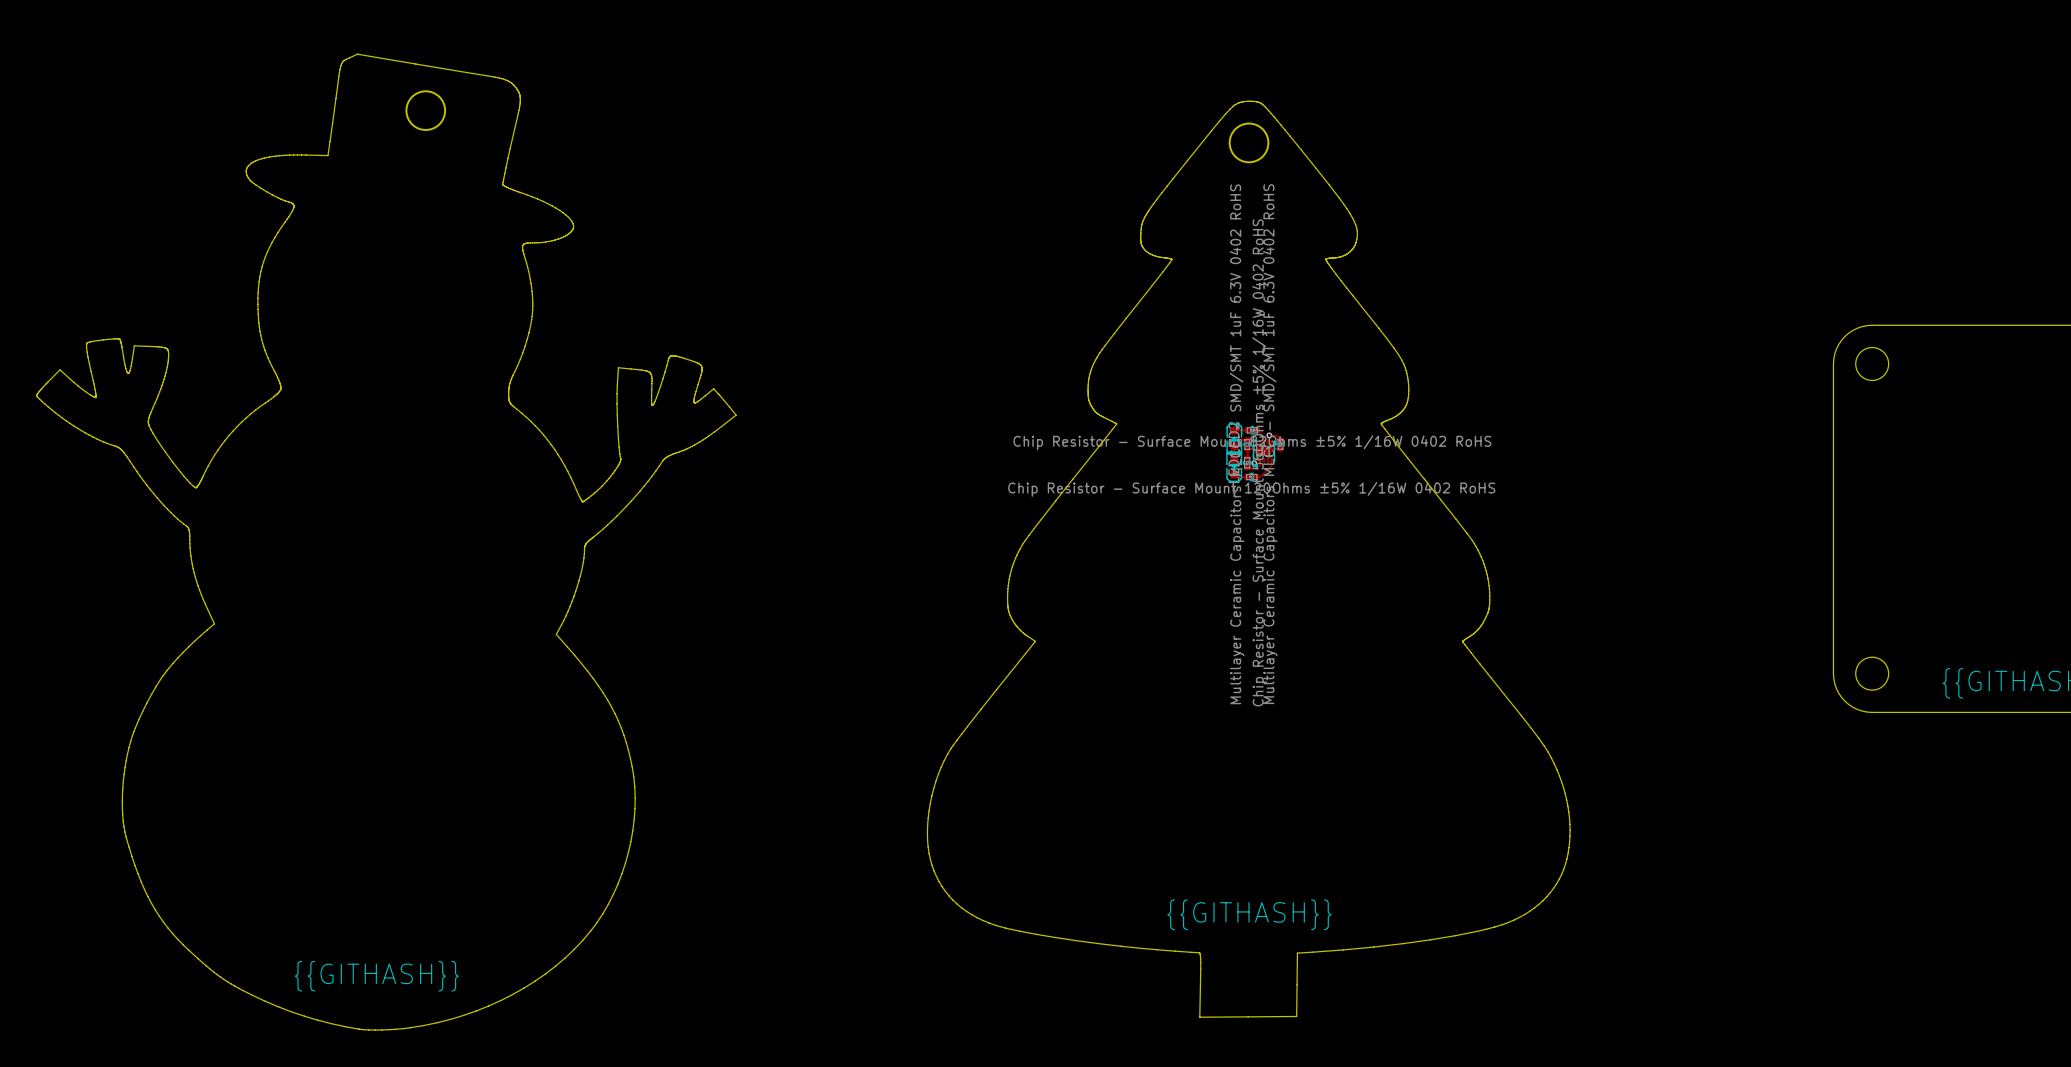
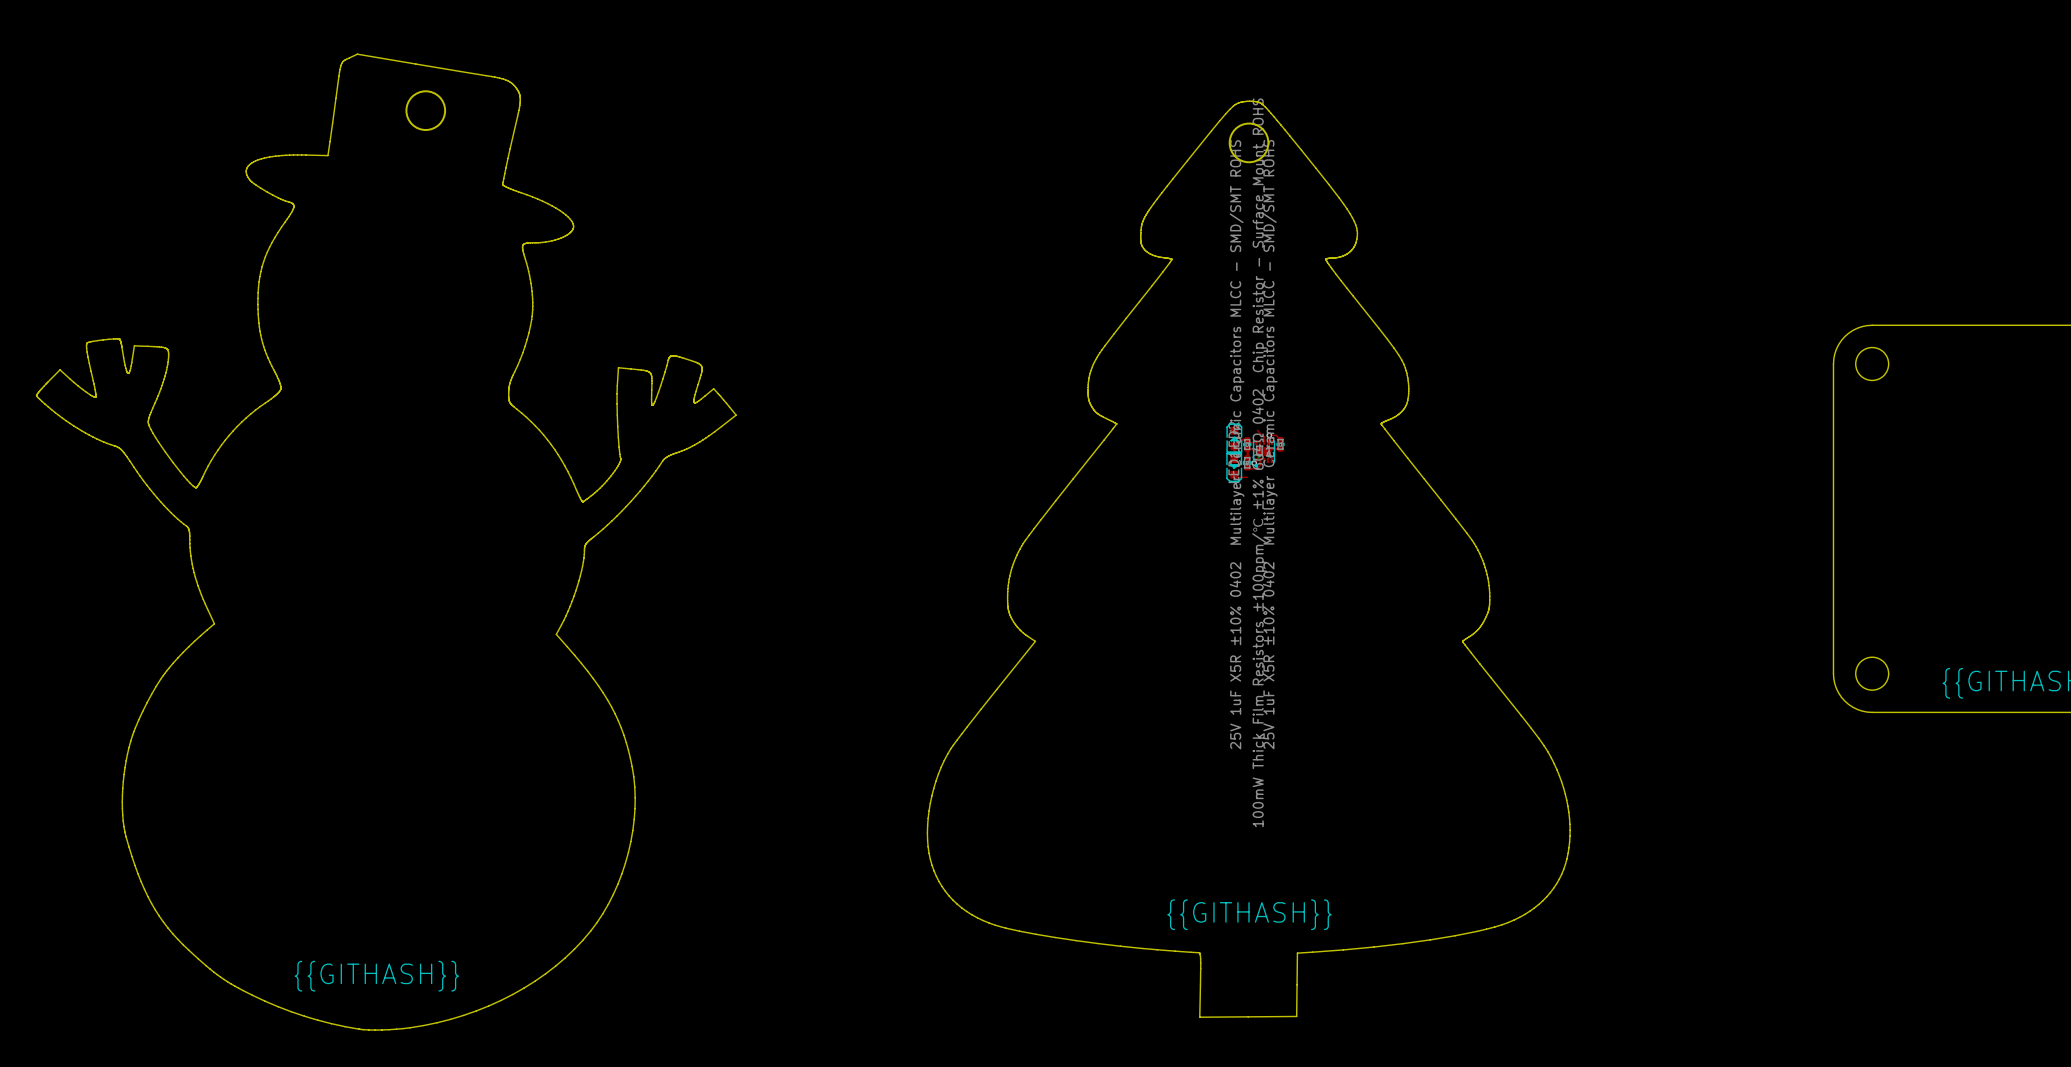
top track: (1247, 430) (1234, 430) -> none
part: Chip Resistor - Surface Mount 82Ohms ±5% 1/16W 0402 RoHS (1252, 430) -> none
part value: Multilayer Ceramic Capacitors MLCC - SMD/SMT 1uF 6.3V 0402 RoHS (1237, 444) -> 25V 1uF X5R ±10% 0402 Multilayer Ceramic Capacitors MLCC - SMD/SMT ROHS (1237, 444)
part value: Multilayer Ceramic Capacitors MLCC - SMD/SMT 1uF 6.3V 0402 RoHS (1270, 444) -> 25V 1uF X5R ±10% 0402 Multilayer Ceramic Capacitors MLCC - SMD/SMT ROHS (1270, 444)
top track: (1271, 460) (1271, 465) (1259, 477) (1257, 477) -> none
part value: Chip Resistor - Surface Mount 560Ohms ±5% 1/16W 0402 RoHS (1259, 462) -> 100mW Thick Film Resistors ±100ppm/℃ ±1% 604Ω 0402 Chip Resistor - Surface Mount ROHS (1259, 462)
part: Chip Resistor - Surface Mount 120Ohms ±5% 1/16W 0402 RoHS (1251, 477) -> none

